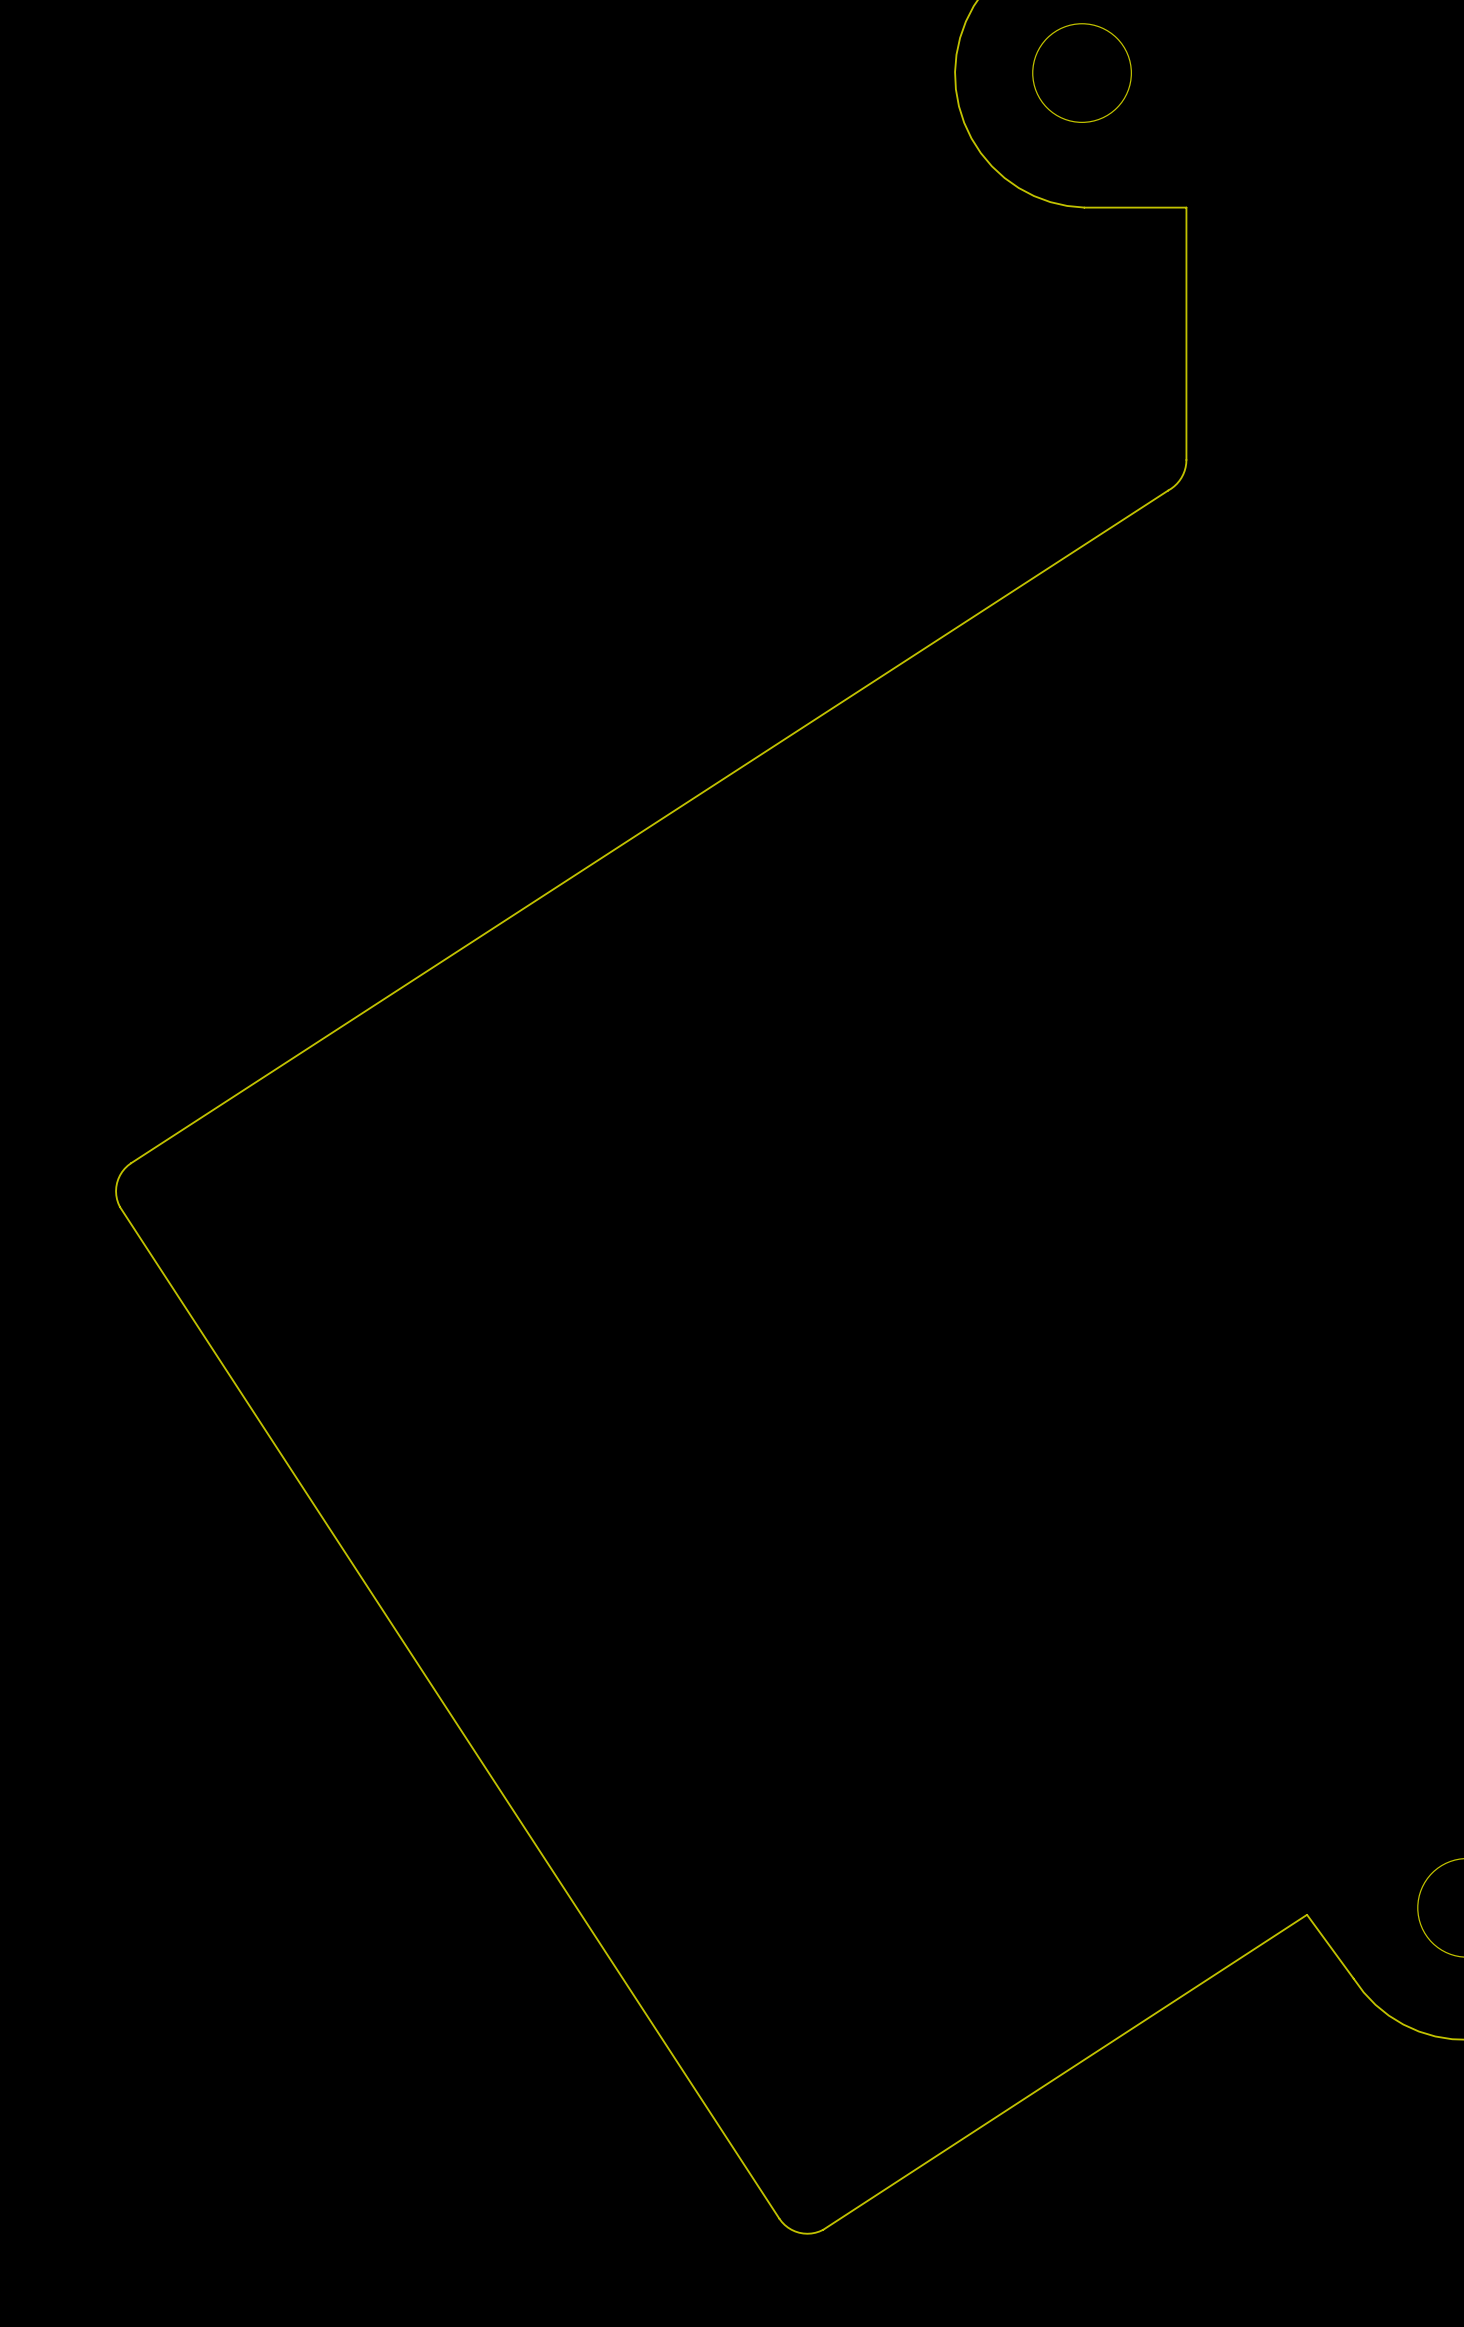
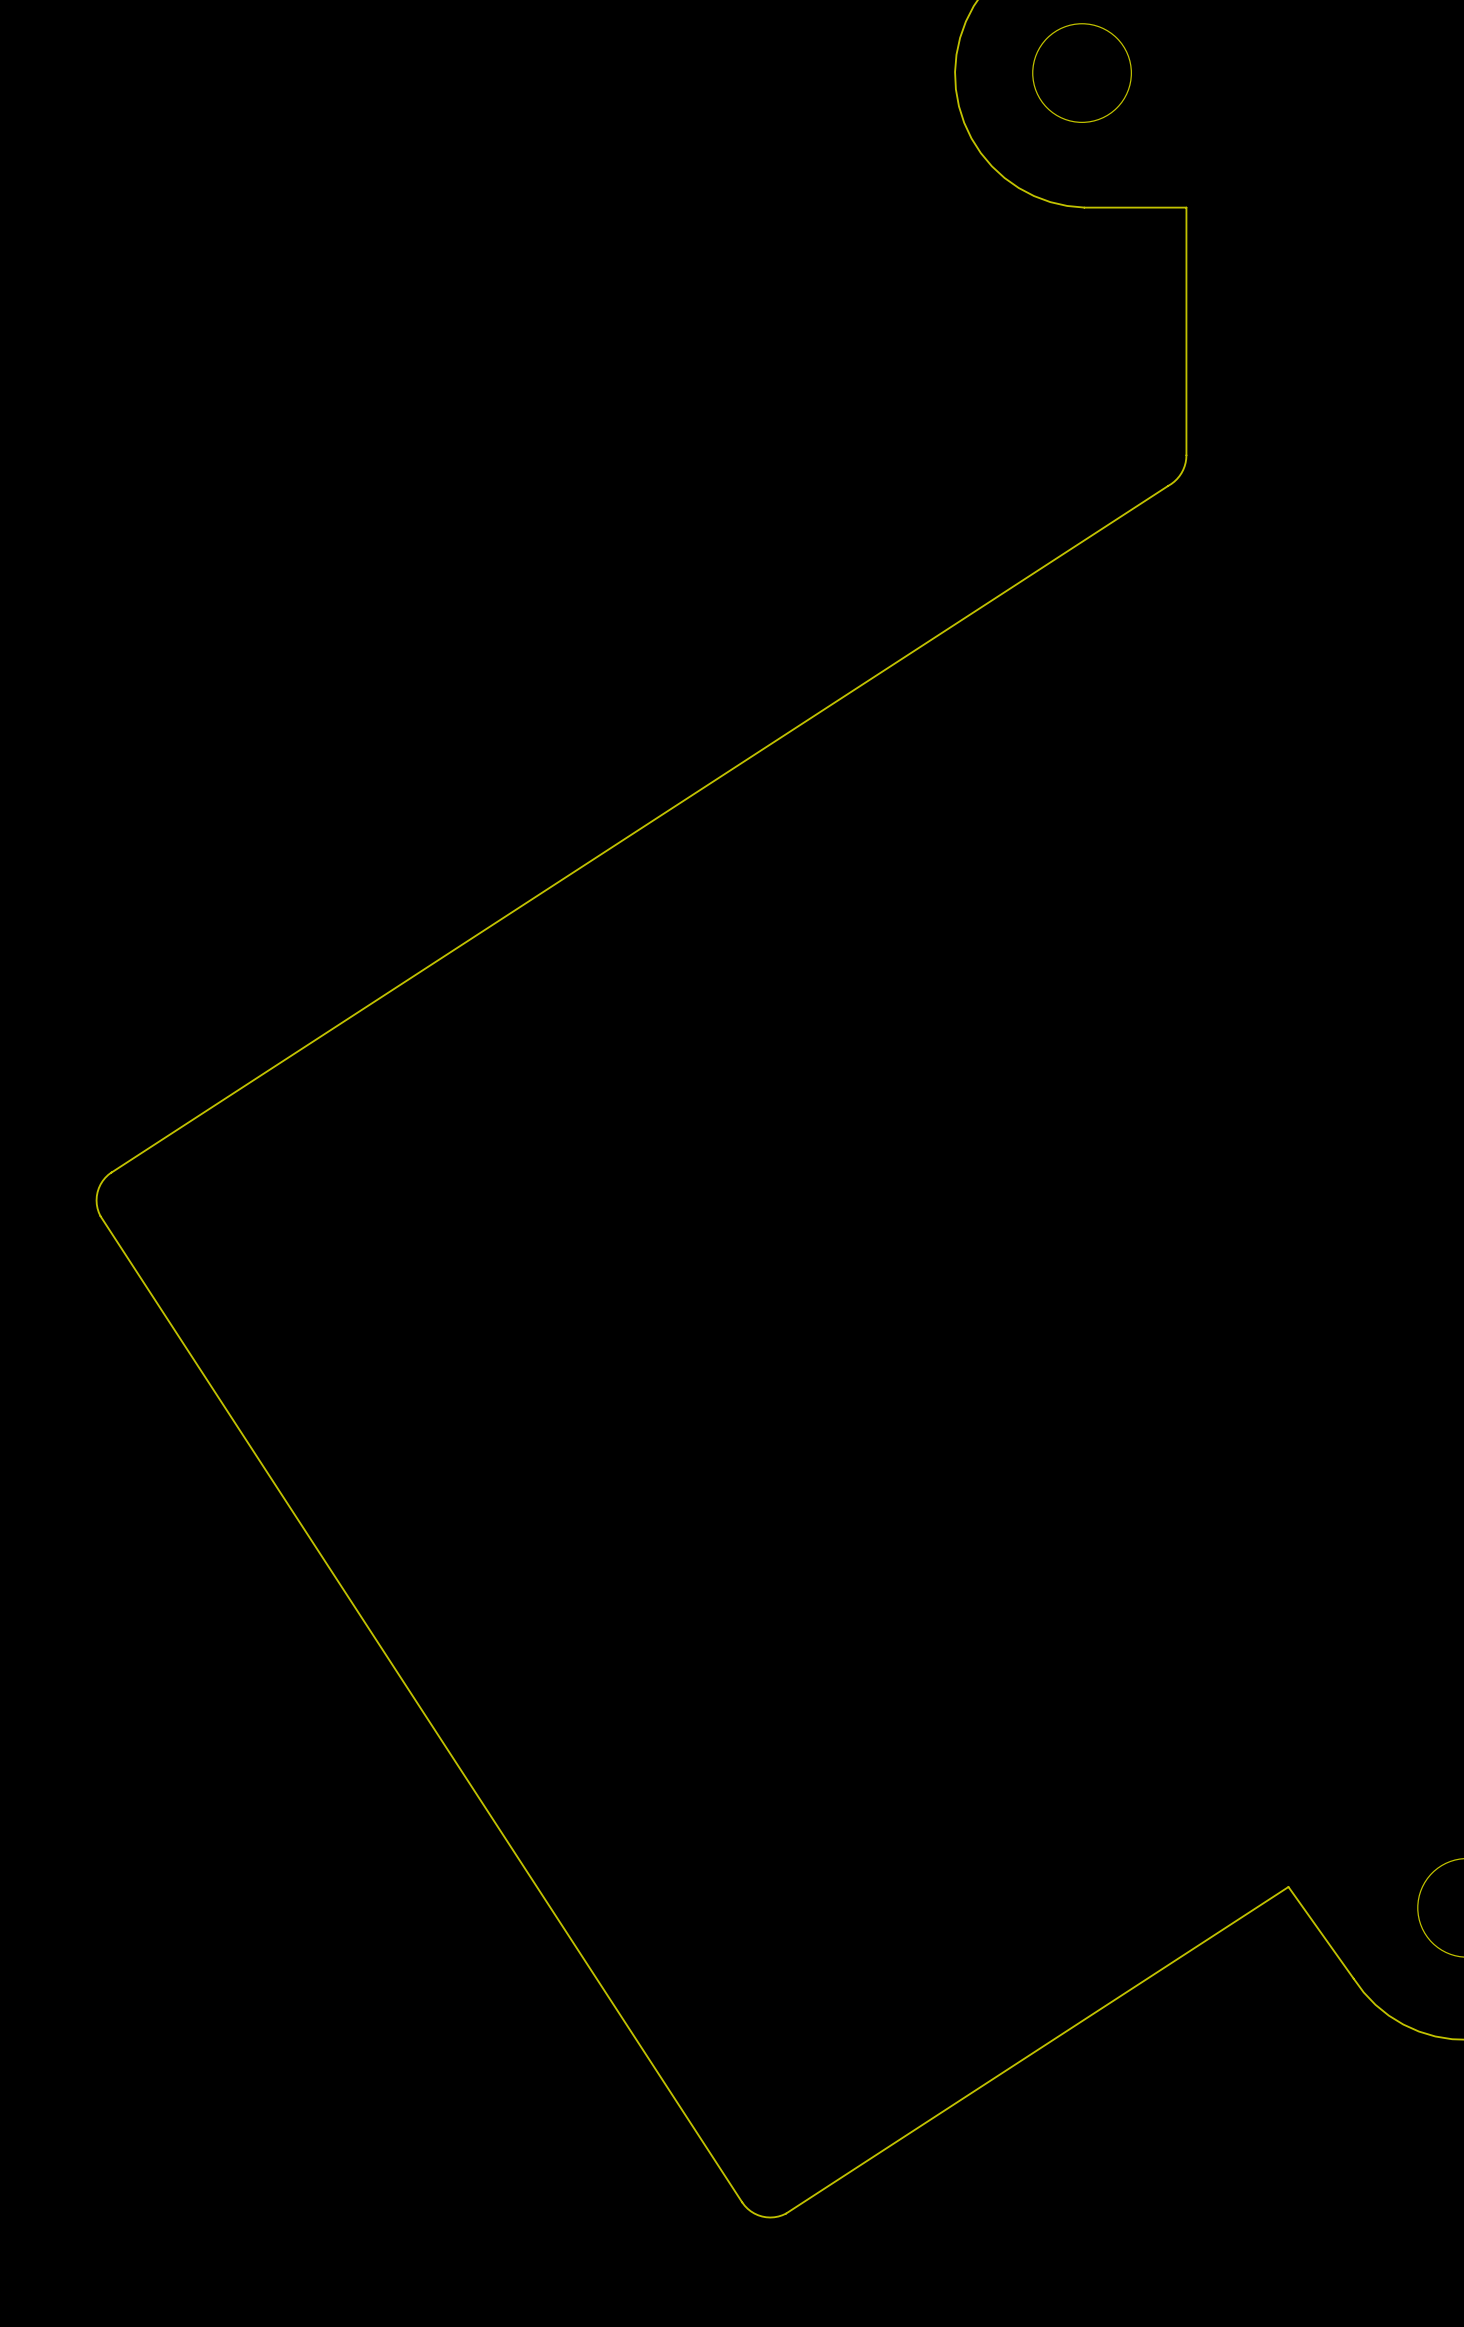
board edge: (1186, 455) (1183, 474) (1171, 488) (131, 1163) (120, 1175) (117, 1183) (116, 1195) (119, 1207) (779, 2218) (788, 2227) (795, 2231) (807, 2233) (823, 2229) (1307, 1914) (1353, 1978) -> (1186, 455) (1181, 473) (1171, 484) (111, 1172) (100, 1184) (97, 1192) (96, 1204) (100, 1216) (742, 2202) (754, 2213) (770, 2217) (786, 2213) (1288, 1886) (1353, 1978)

